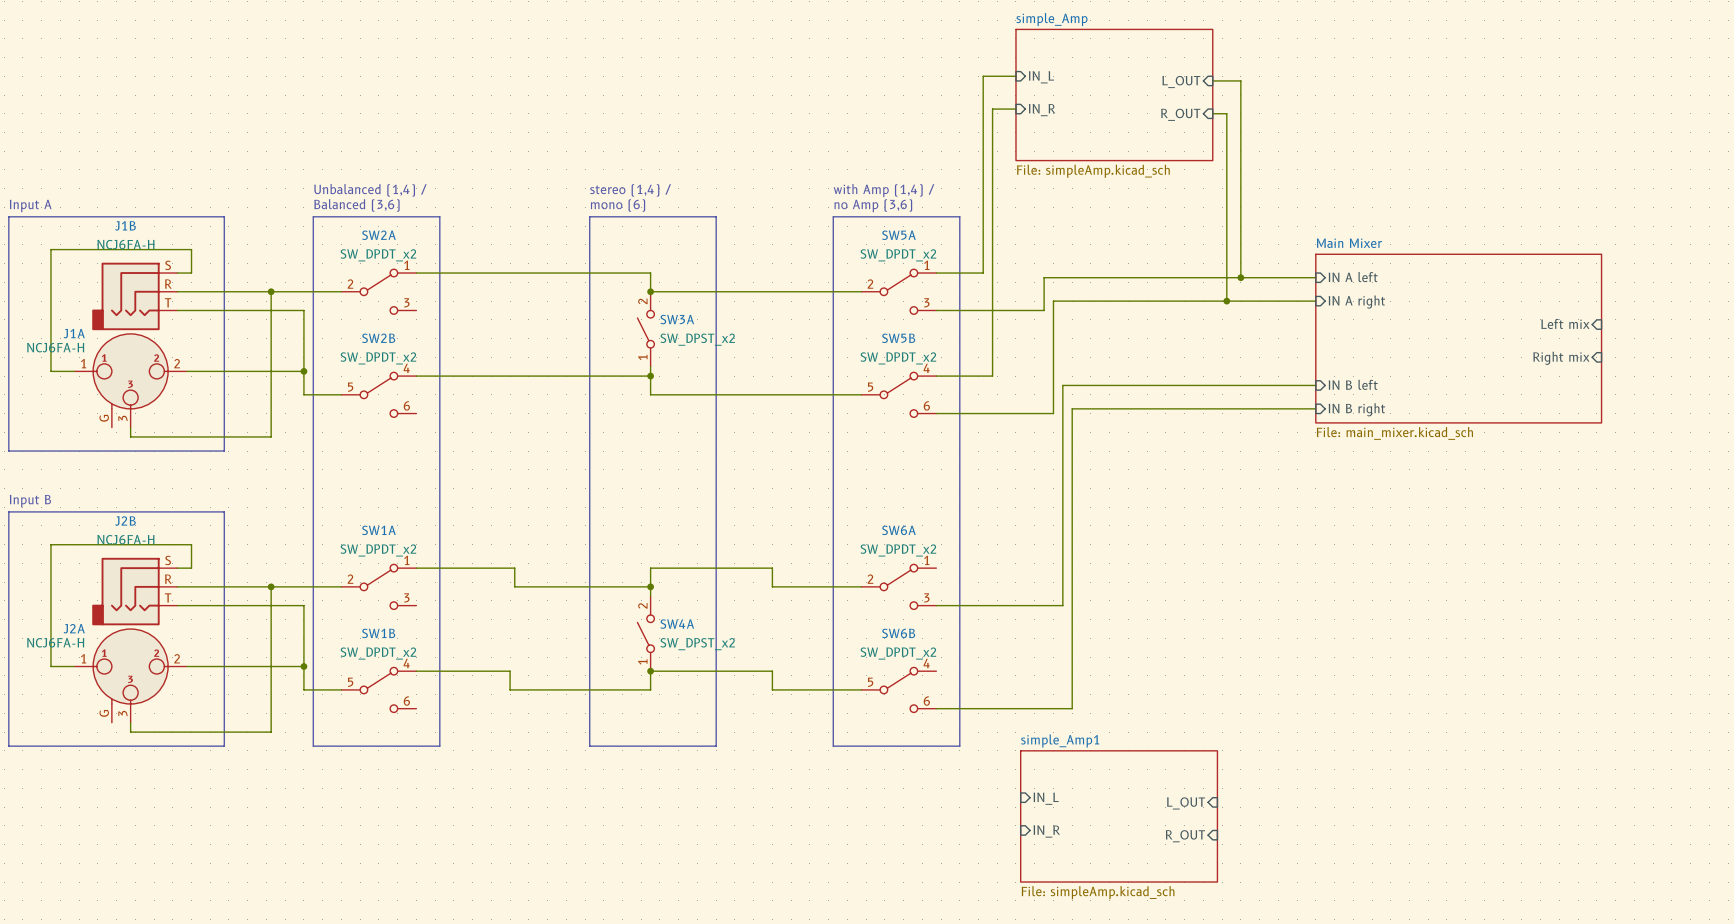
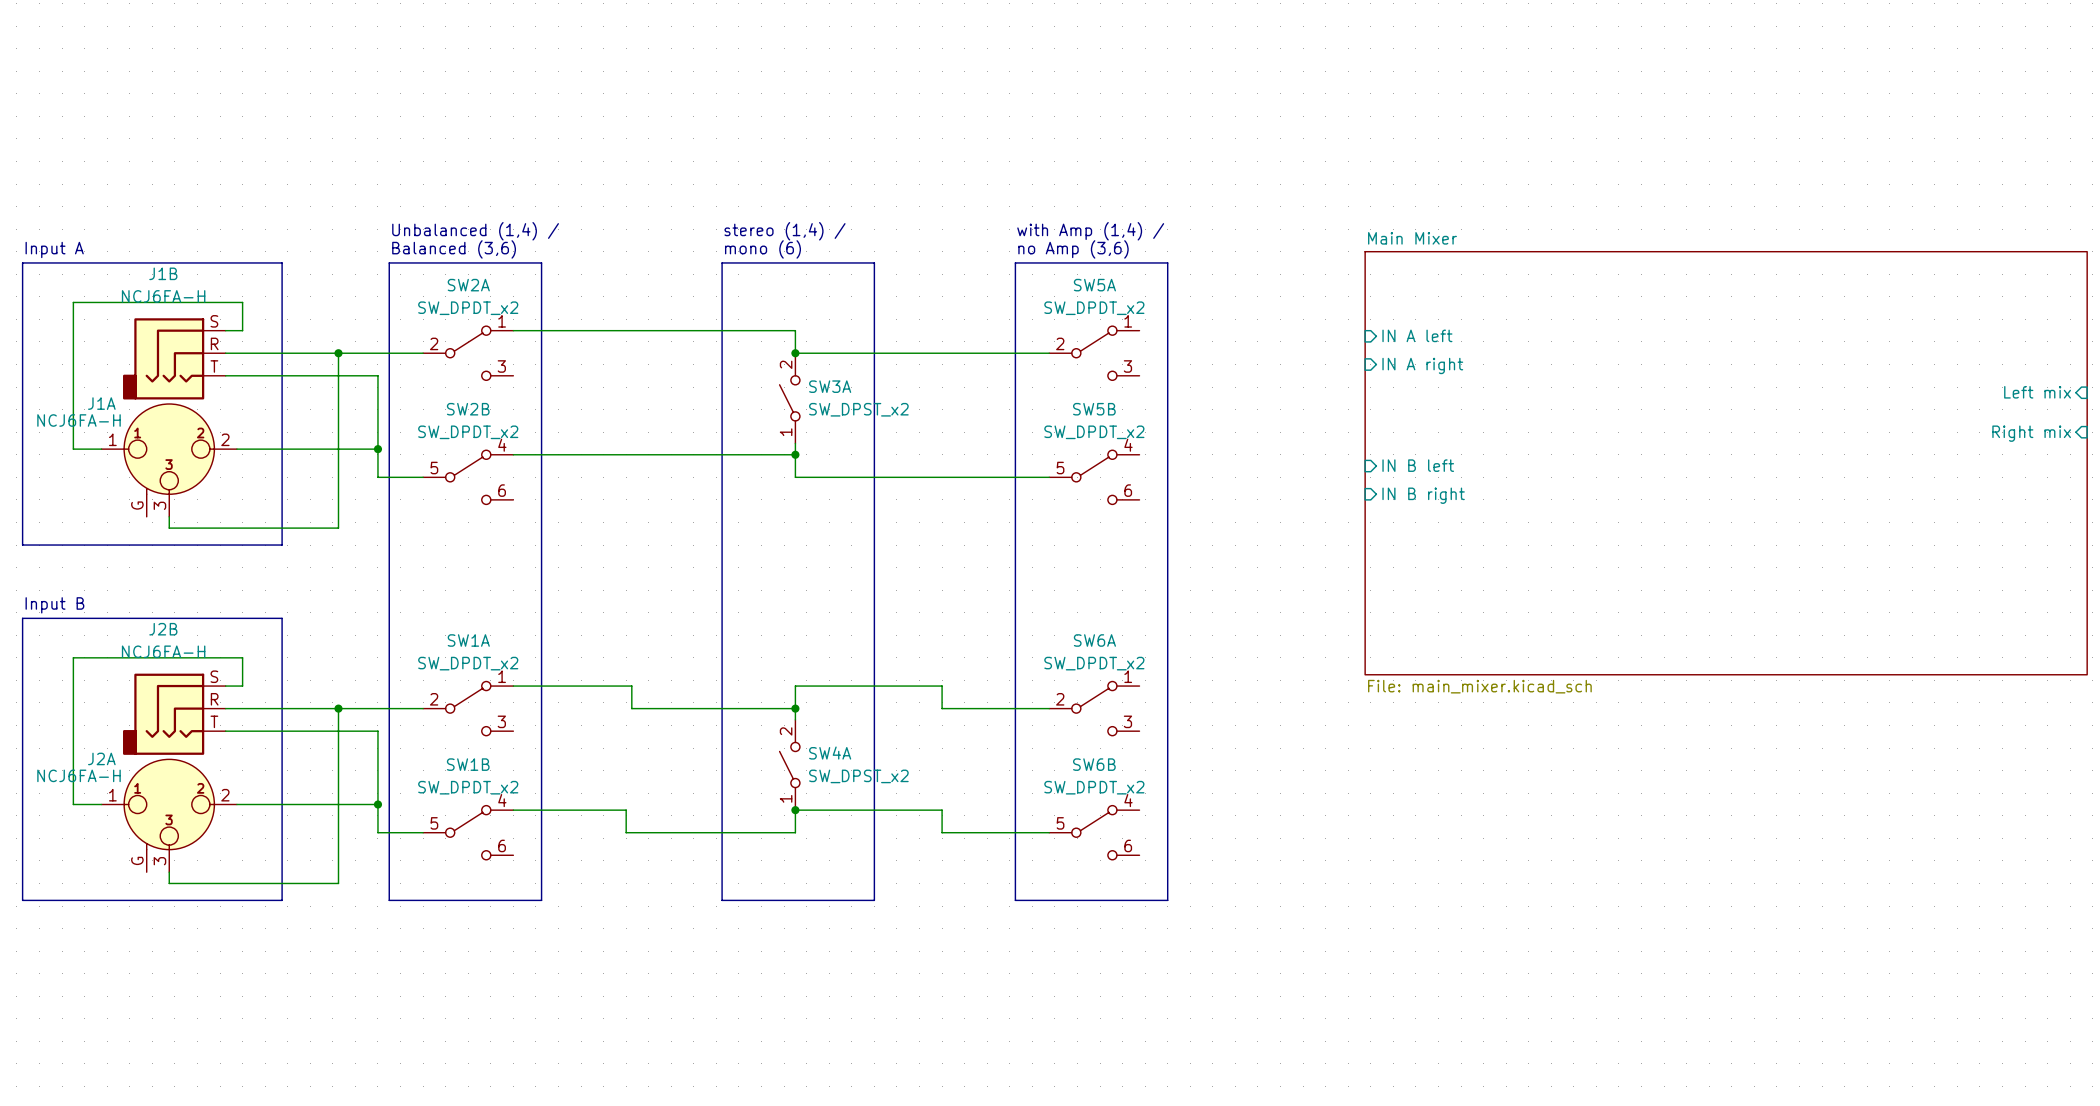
wire: (1015, 76) (983, 76) (983, 273) (936, 273) -> none
sheet pin: IN_L (1041, 77) -> none
wire: (1212, 80) (1240, 80) (1240, 277) -> none
sheet pin: L_OUT (1181, 82) -> none
sheet simple_Amp: File: simpleAmp.kicad_sch (1114, 95) -> none
wire: (1015, 109) (992, 109) (992, 376) (936, 376) -> none
sheet pin: IN_R (1042, 110) -> none
wire: (1212, 113) (1226, 113) (1226, 301) -> none
sheet pin: R_OUT (1180, 114) -> none
sheet pin: none -> IN A left (1417, 335)
junction: (1240, 277) -> none
wire: (1315, 277) (1044, 277) (1044, 310) (936, 310) -> none
sheet pin: IN A left (1353, 277) -> none
junction: (1226, 301) -> none
wire: (1315, 301) (1053, 301) (1053, 413) (936, 413) -> none
sheet pin: none -> IN A right (1422, 365)
sheet pin: IN A right (1356, 302) -> none
sheet pin position: Left mix (1565, 323) -> Left mix (2037, 392)
sheet Main Mixer: File: main_mixer.kicad_sch (1458, 338) -> none
sheet pin position: Right mix (1561, 358) -> Right mix (2031, 433)
sheet Main Mixer: none -> File: main_mixer.kicad_sch (1726, 463)
sheet pin: none -> IN B left (1418, 465)
sheet pin: IN B left (1353, 384) -> none
wire: (1315, 385) (1062, 385) (1062, 605) (936, 605) -> none
wire: (1315, 408) (1072, 408) (1072, 708) (936, 708) -> none
sheet pin: none -> IN B right (1423, 495)
sheet pin: IN B right (1356, 409) -> none
sheet pin: IN_L (1046, 798) -> none
sheet pin: L_OUT (1186, 803) -> none
sheet simple_Amp1: File: simpleAmp.kicad_sch (1119, 816) -> none
sheet pin: IN_R (1046, 831) -> none
sheet pin: R_OUT (1185, 836) -> none

